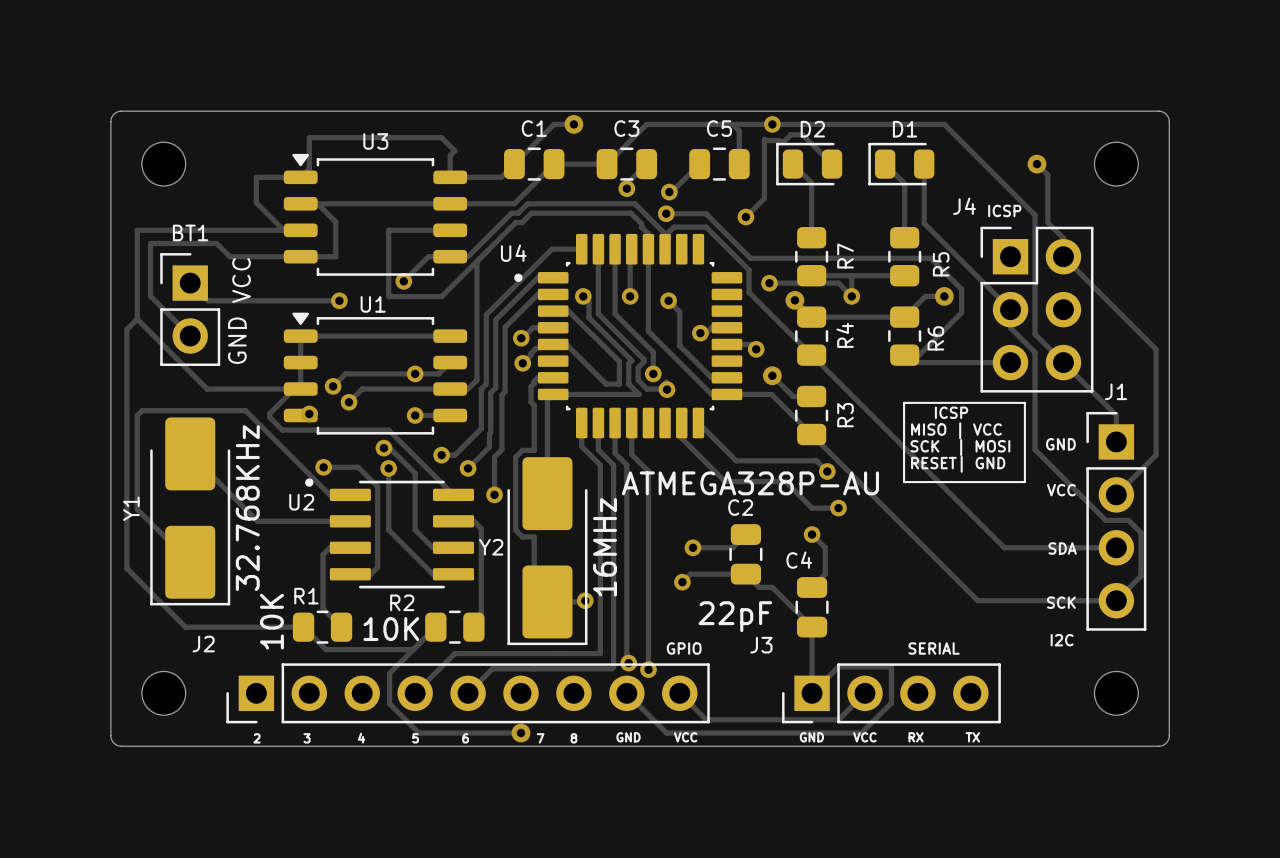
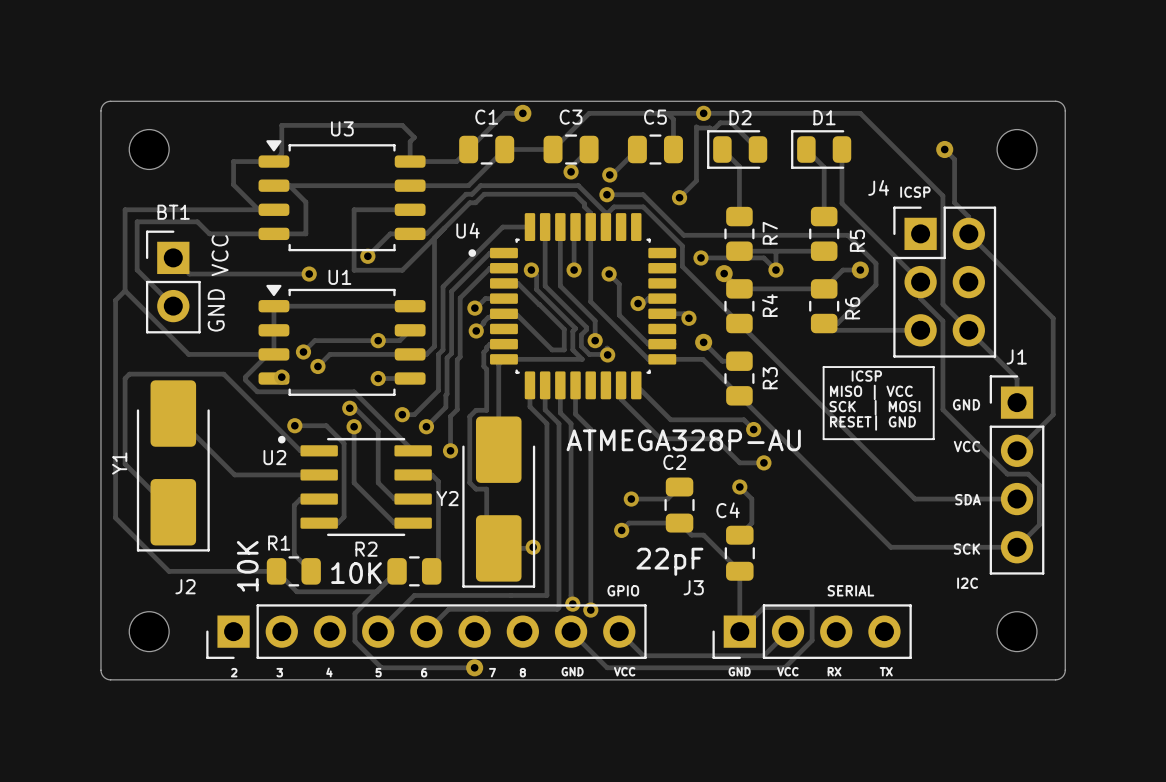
Y1 value: 32.768KHz (247, 508) -> none
Y2 value: 16MHz (605, 547) -> none

